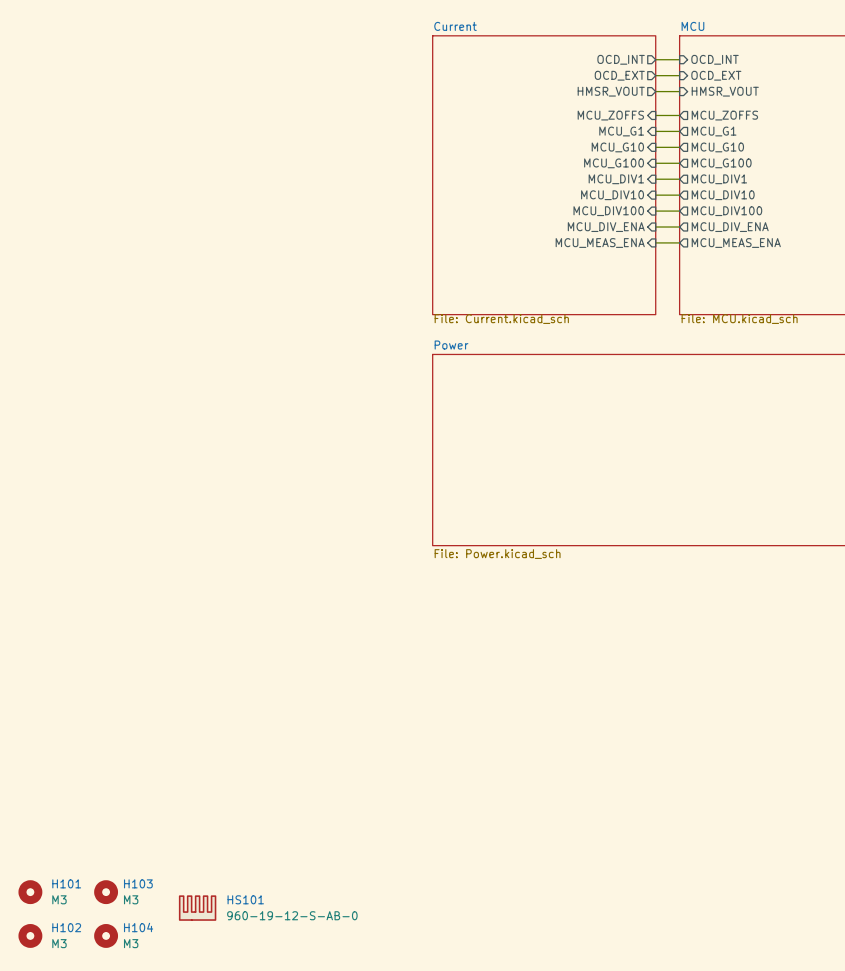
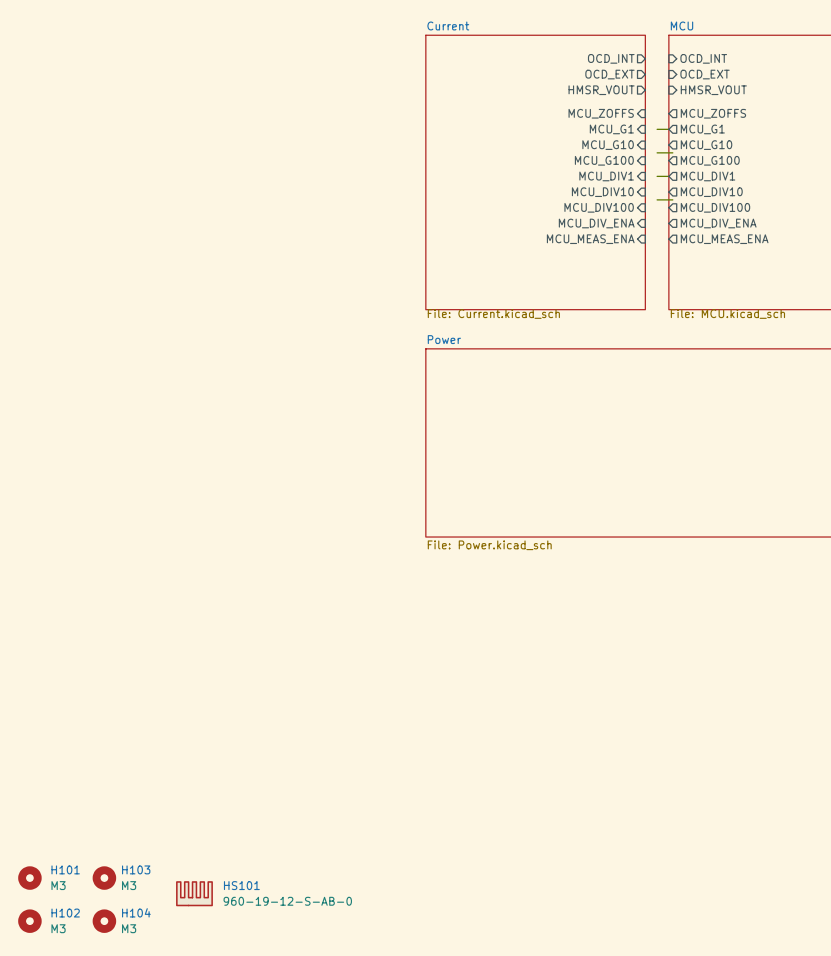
wire: (655, 59) (679, 59) -> none
wire: (655, 75) (679, 75) -> none
wire: (655, 91) (679, 91) -> none
wire: (655, 115) (679, 115) -> none
wire: (655, 131) (667, 131) -> none
wire: (655, 147) (679, 147) -> none
wire: none -> (657, 152) (672, 152)
wire: (655, 163) (679, 163) -> none
wire: (655, 179) (667, 179) -> none
wire: (655, 195) (679, 195) -> none
wire: none -> (657, 199) (672, 199)
wire: (655, 211) (679, 211) -> none
wire: (655, 227) (679, 227) -> none
wire: (655, 242) (679, 242) -> none

